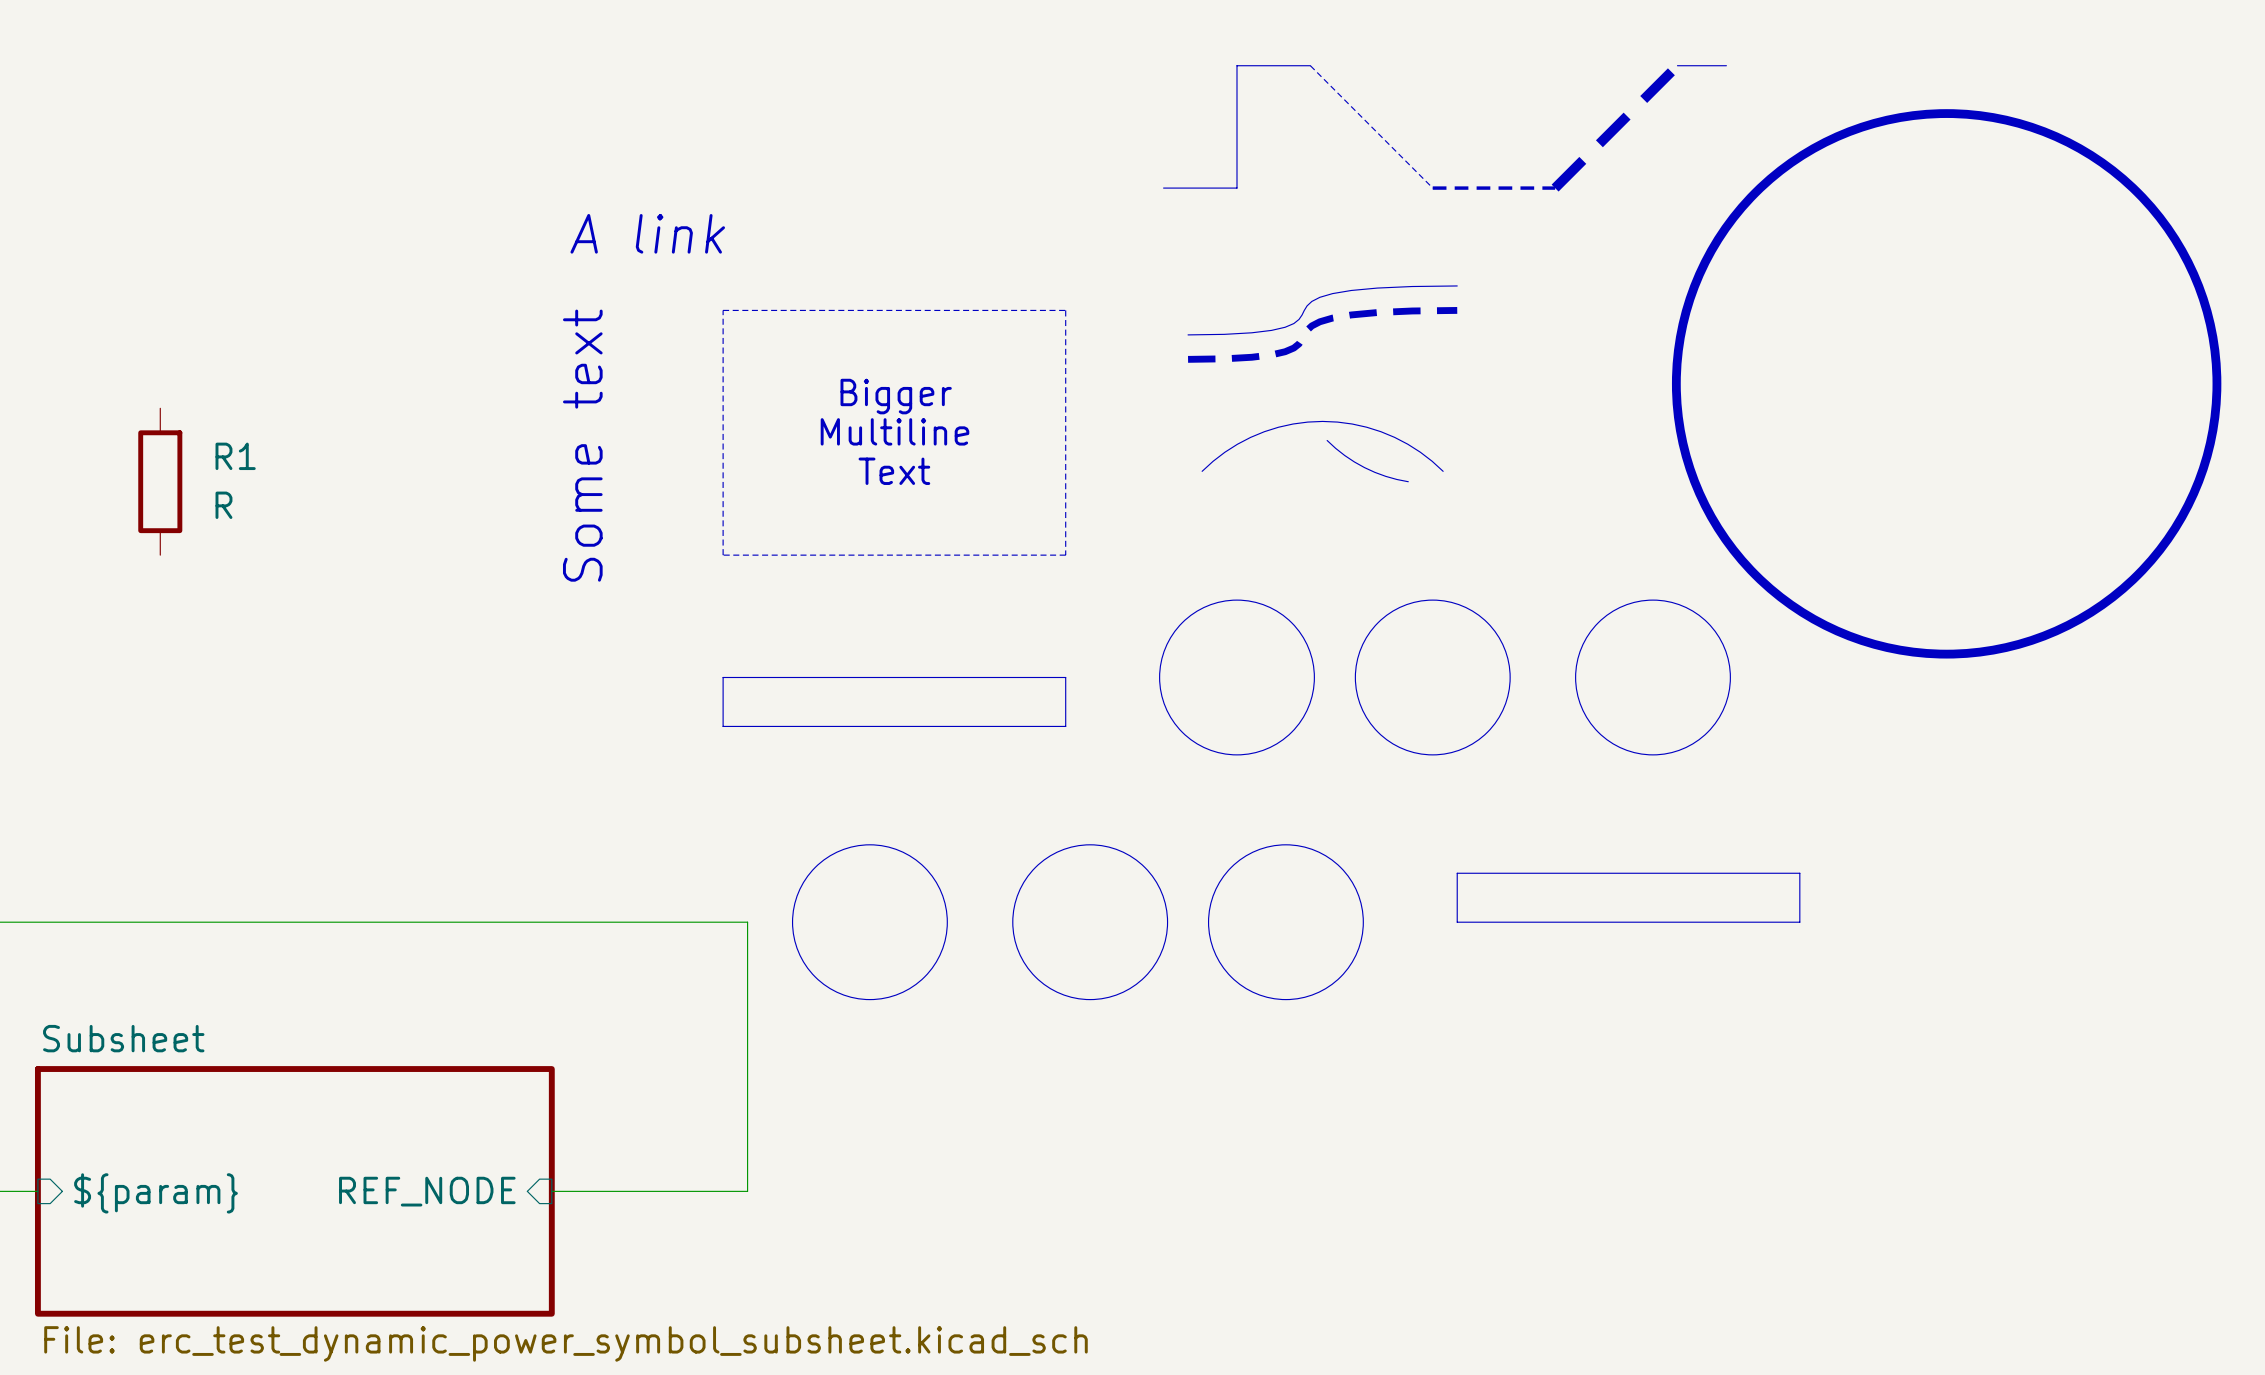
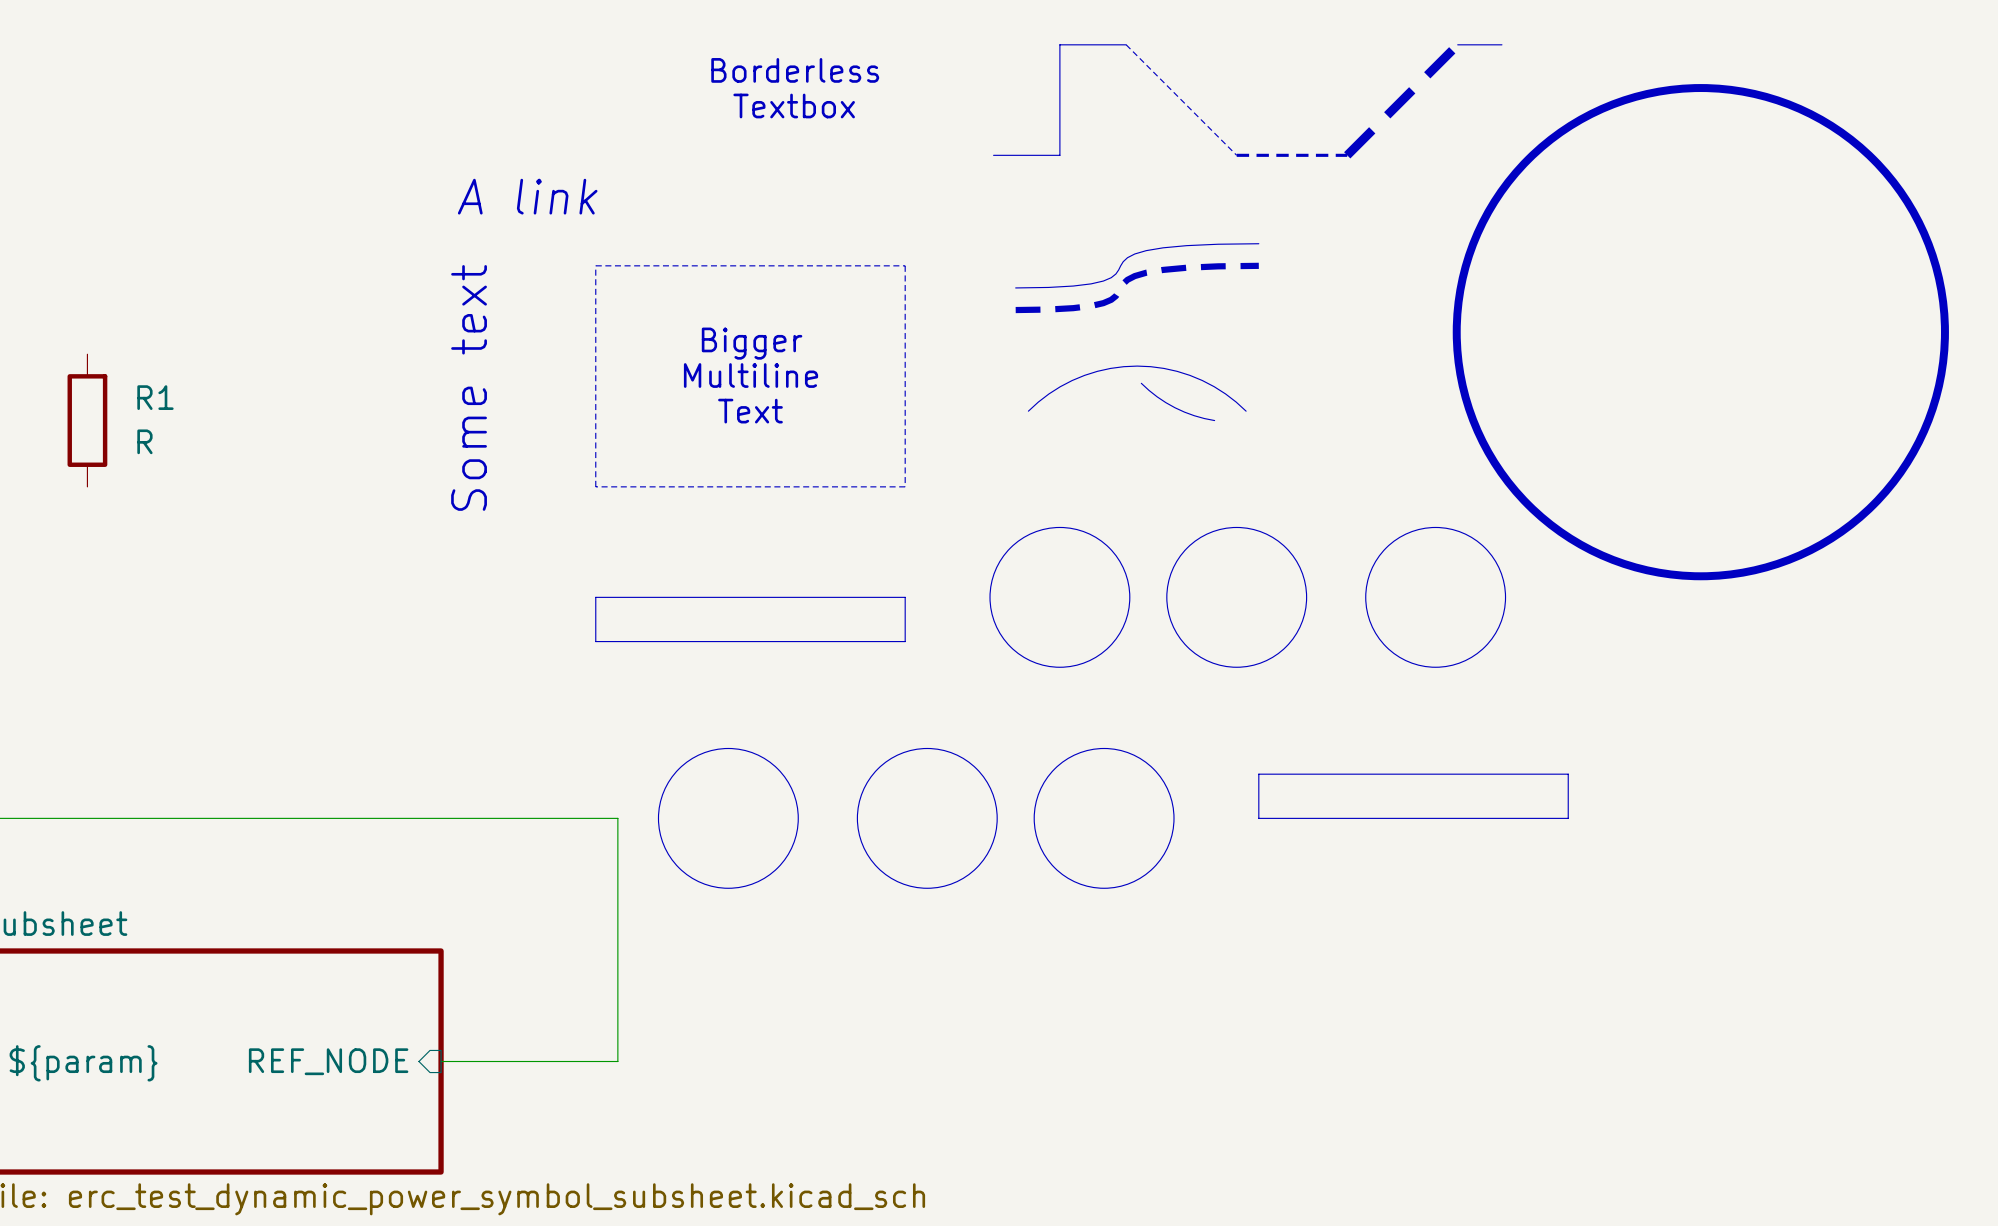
text: none -> Borderless (795, 70)
text: none -> Textbox (794, 105)

